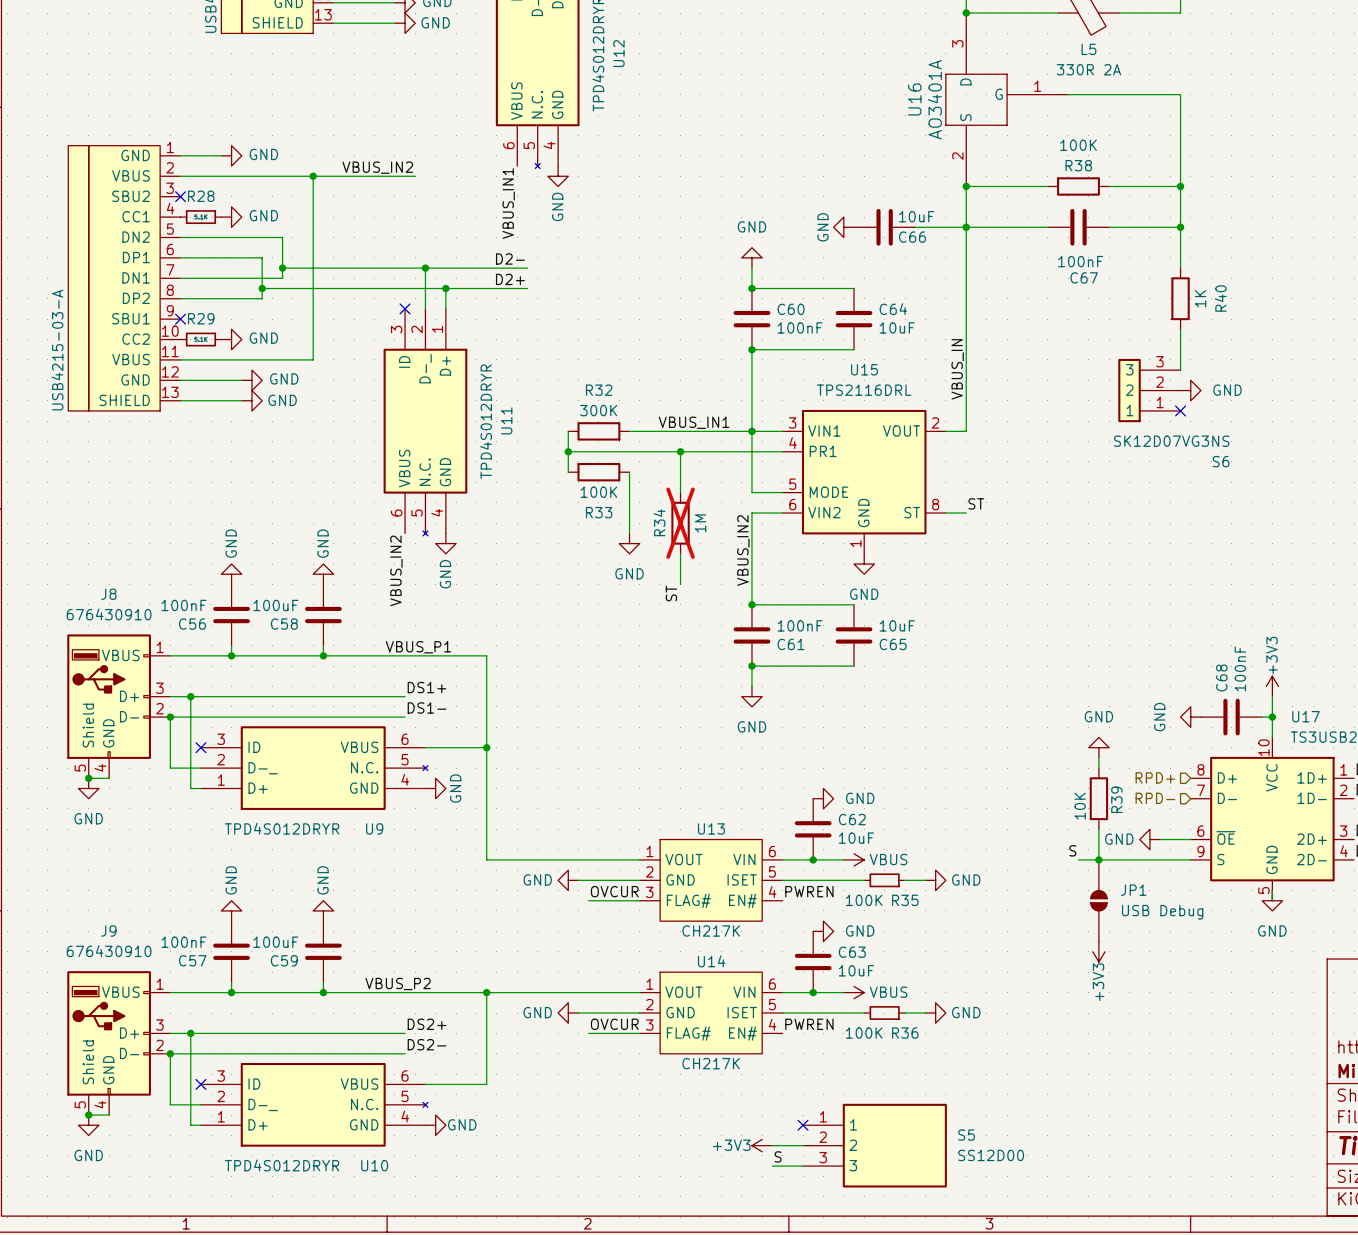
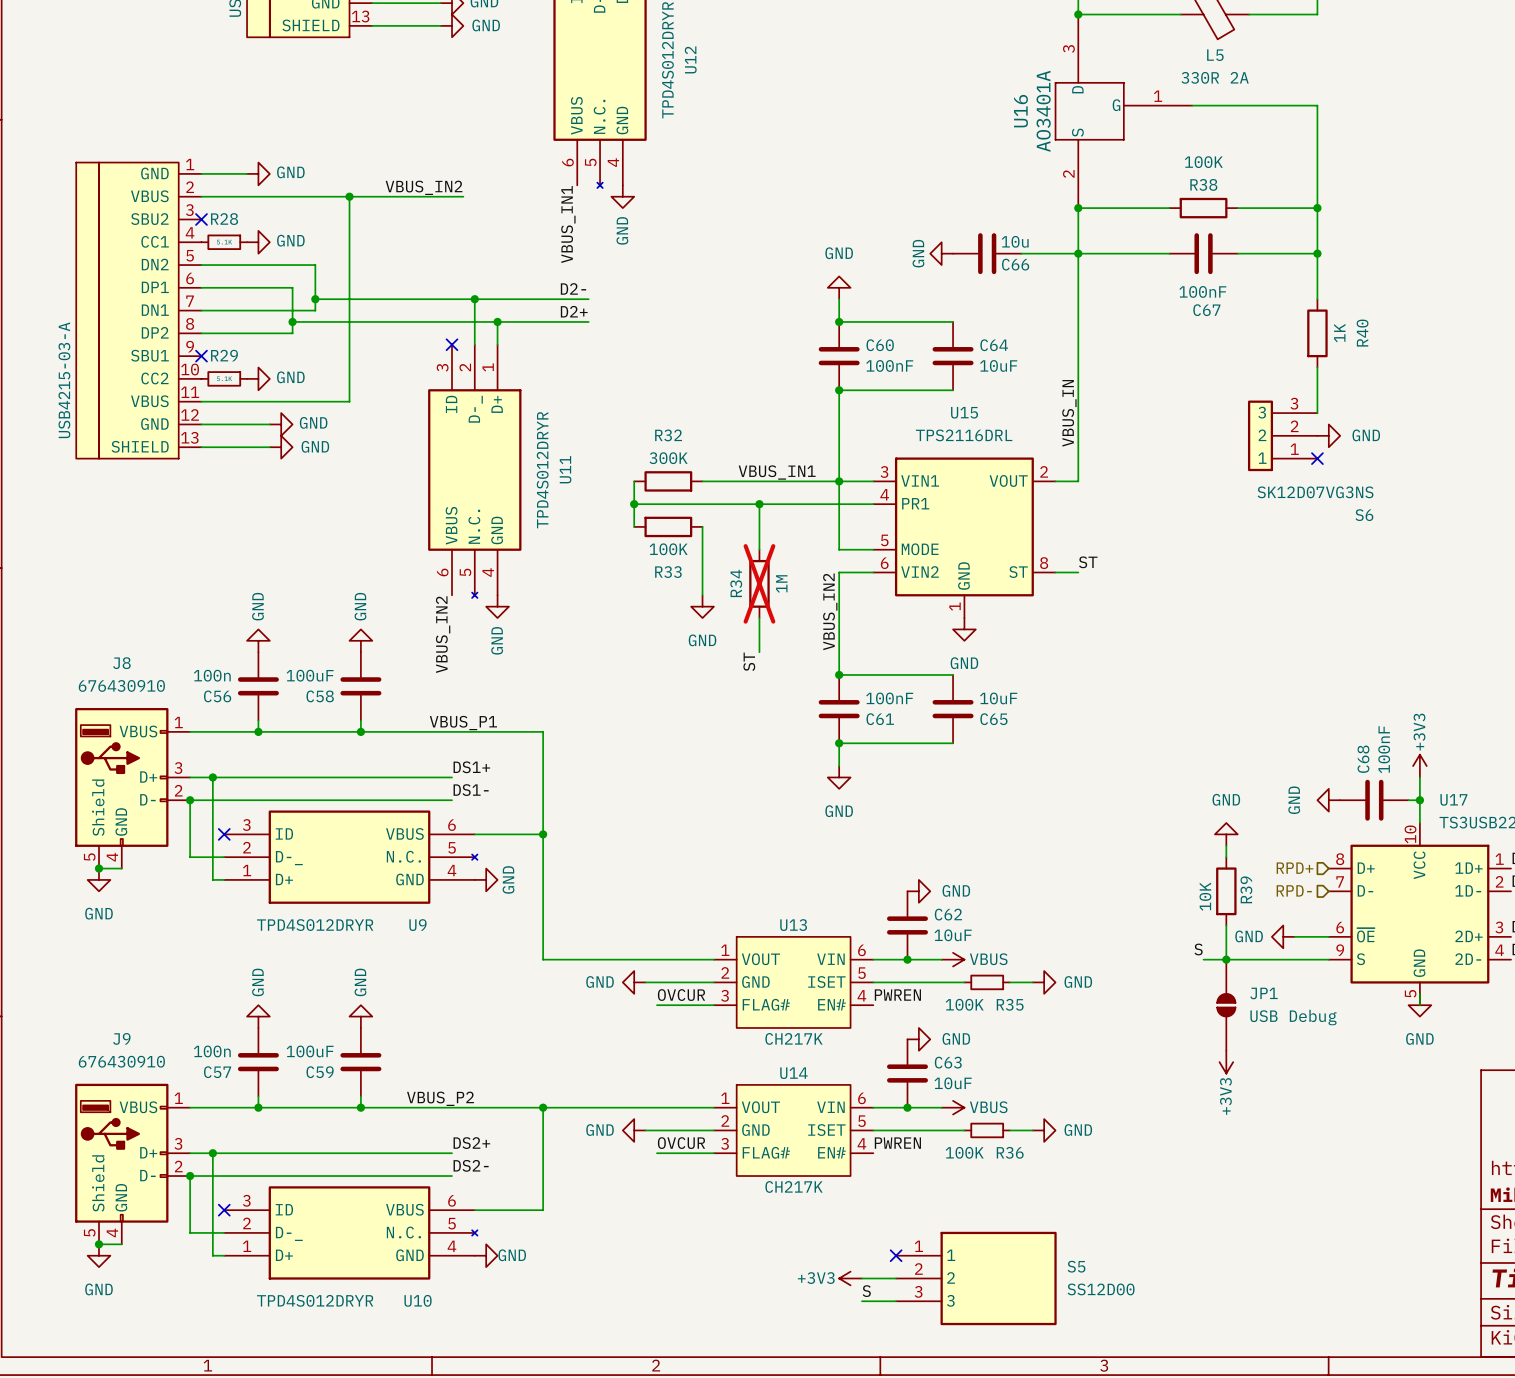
C66 value: 10uF (916, 216) -> 10u (1015, 241)
C56 value: 100nF (183, 605) -> 100n (212, 675)
C57 value: 100nF (183, 942) -> 100n (212, 1051)

